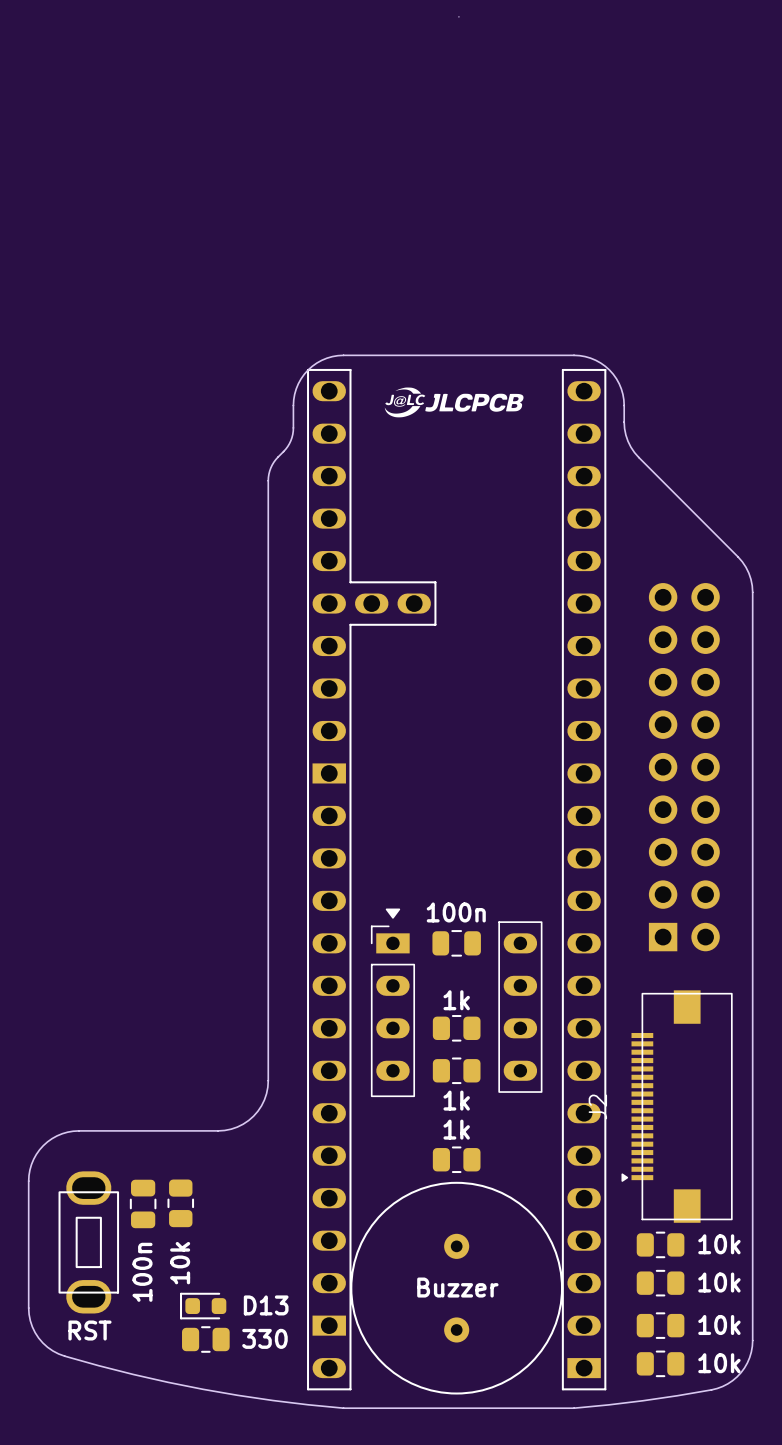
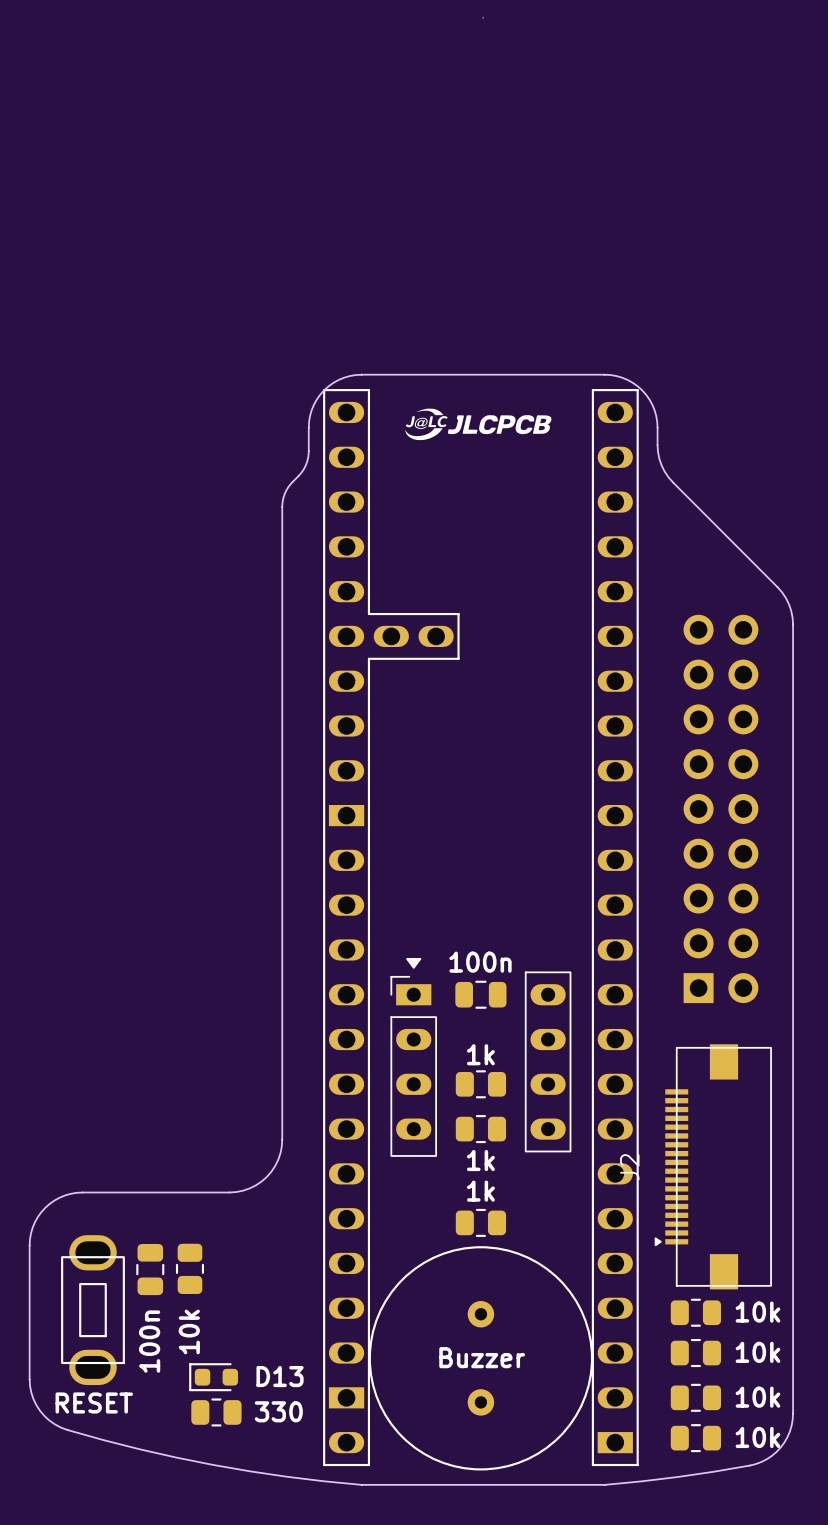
part value: RST (89, 1330) -> RESET (94, 1402)

